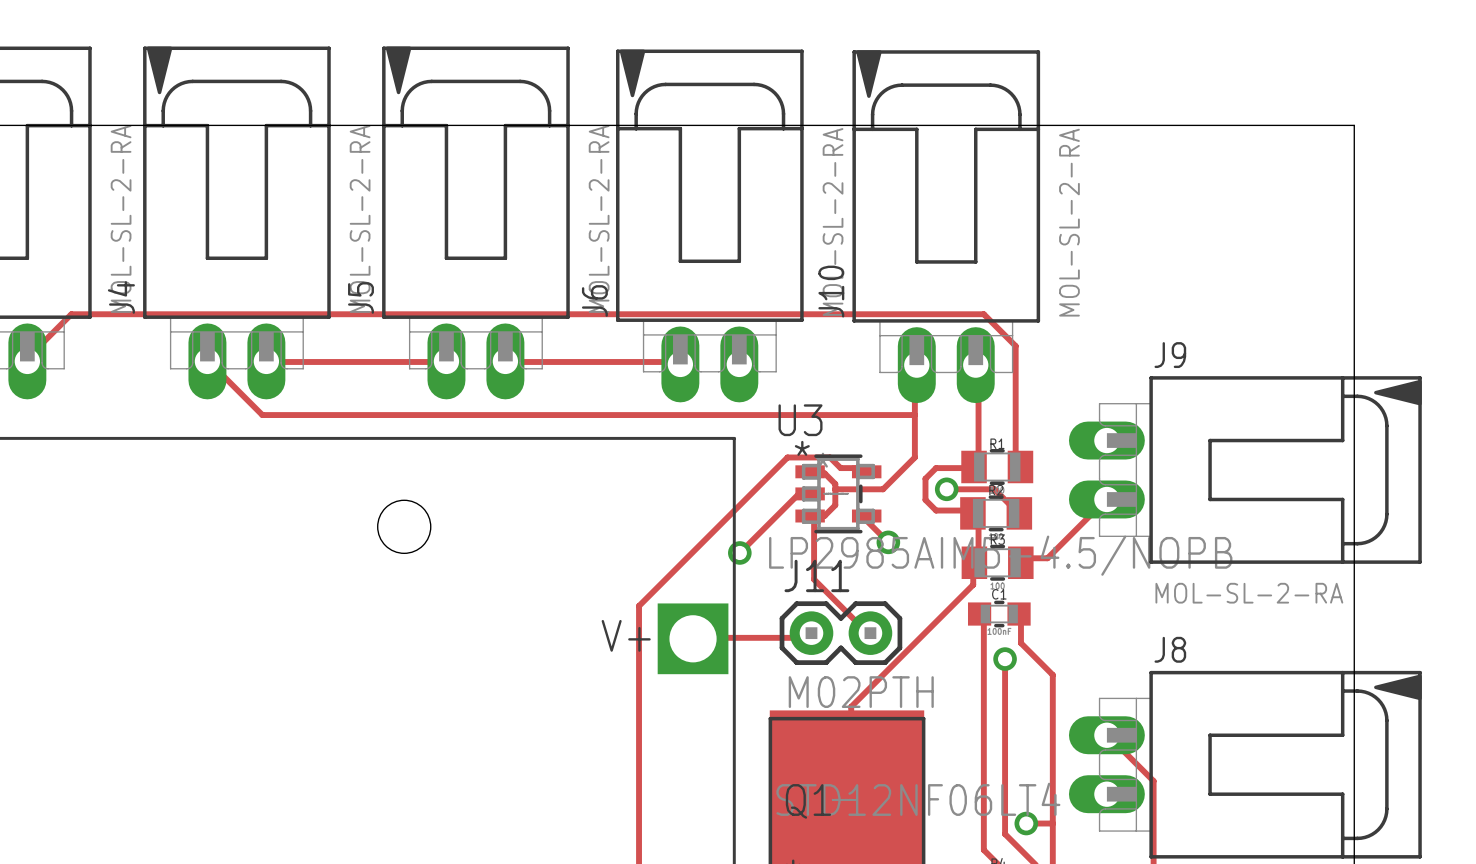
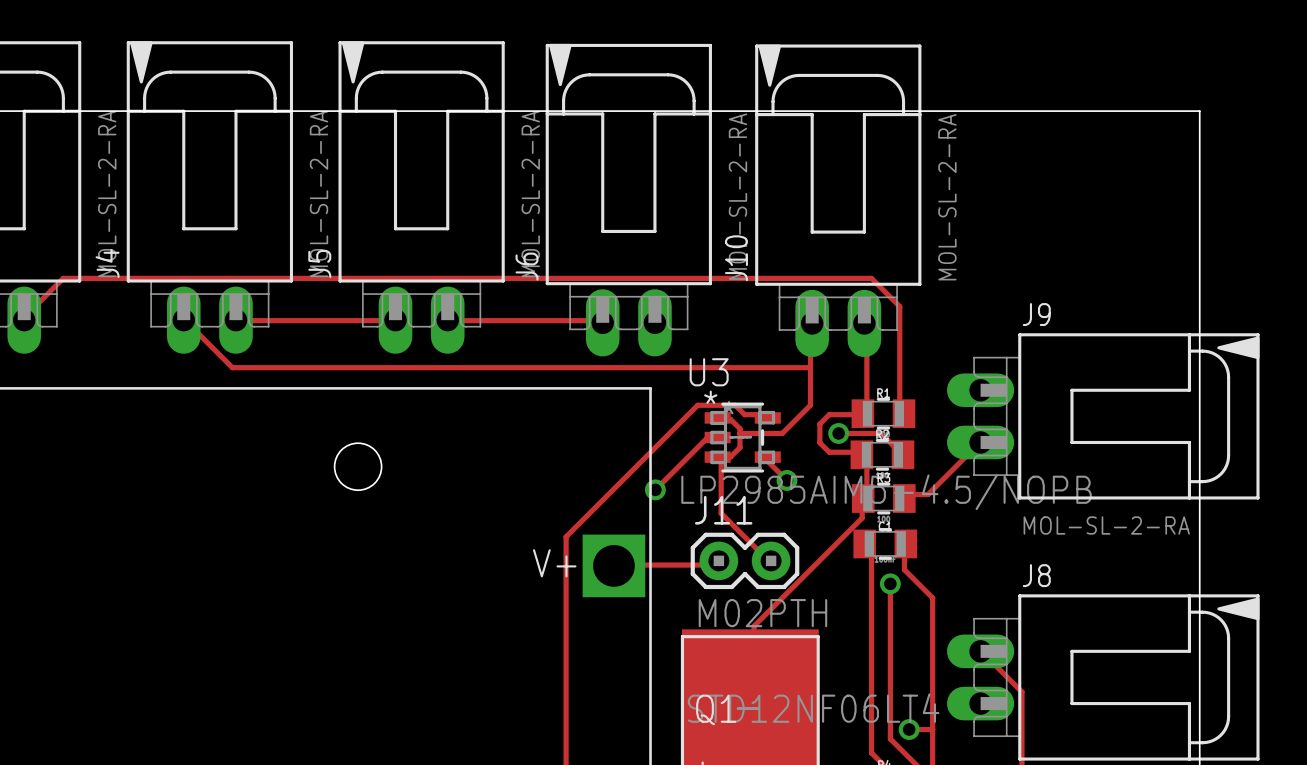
C1 footprint: [967, 600, 1031, 628] -> [853, 528, 918, 560]

